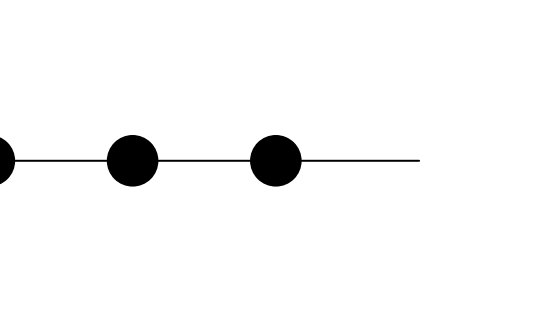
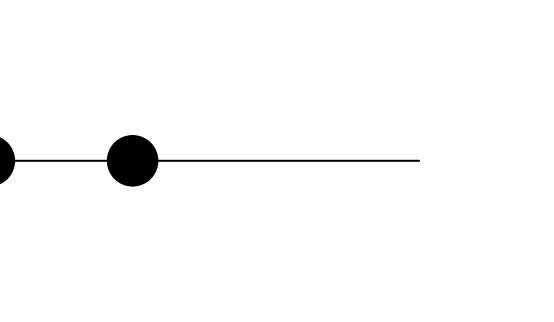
junction: (275, 160) -> none

